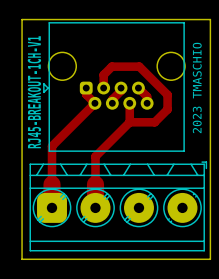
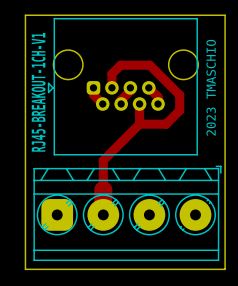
track: (94, 103) (52, 146) (52, 207) -> none

